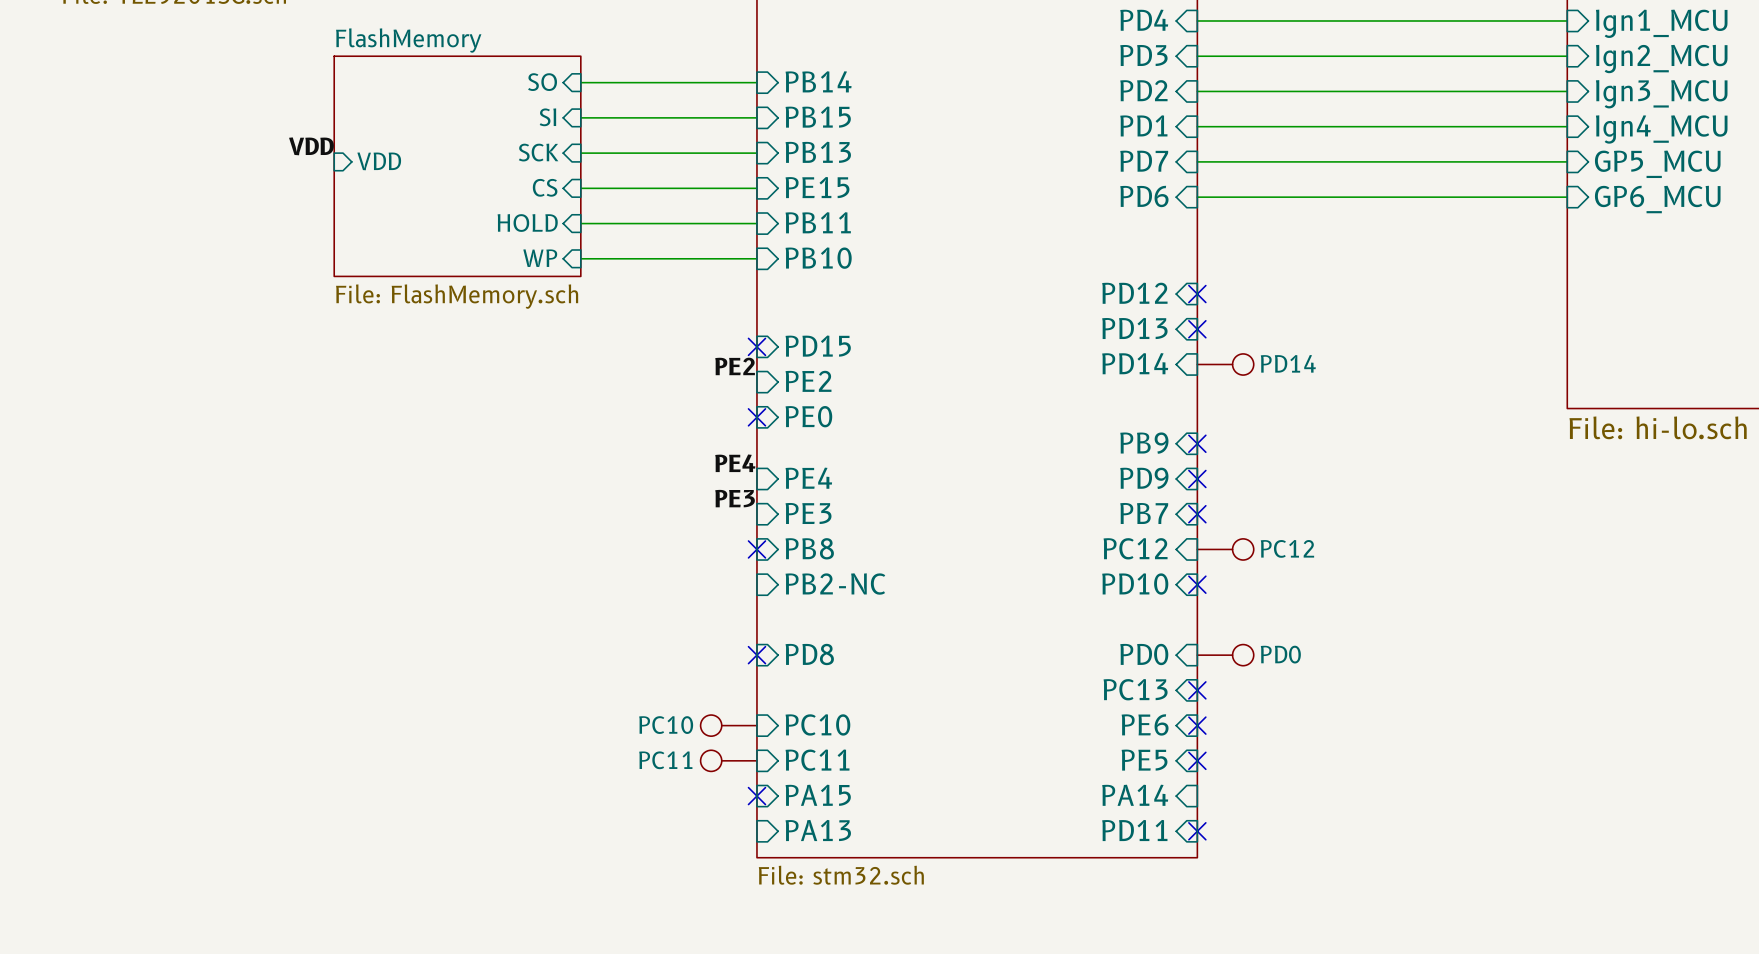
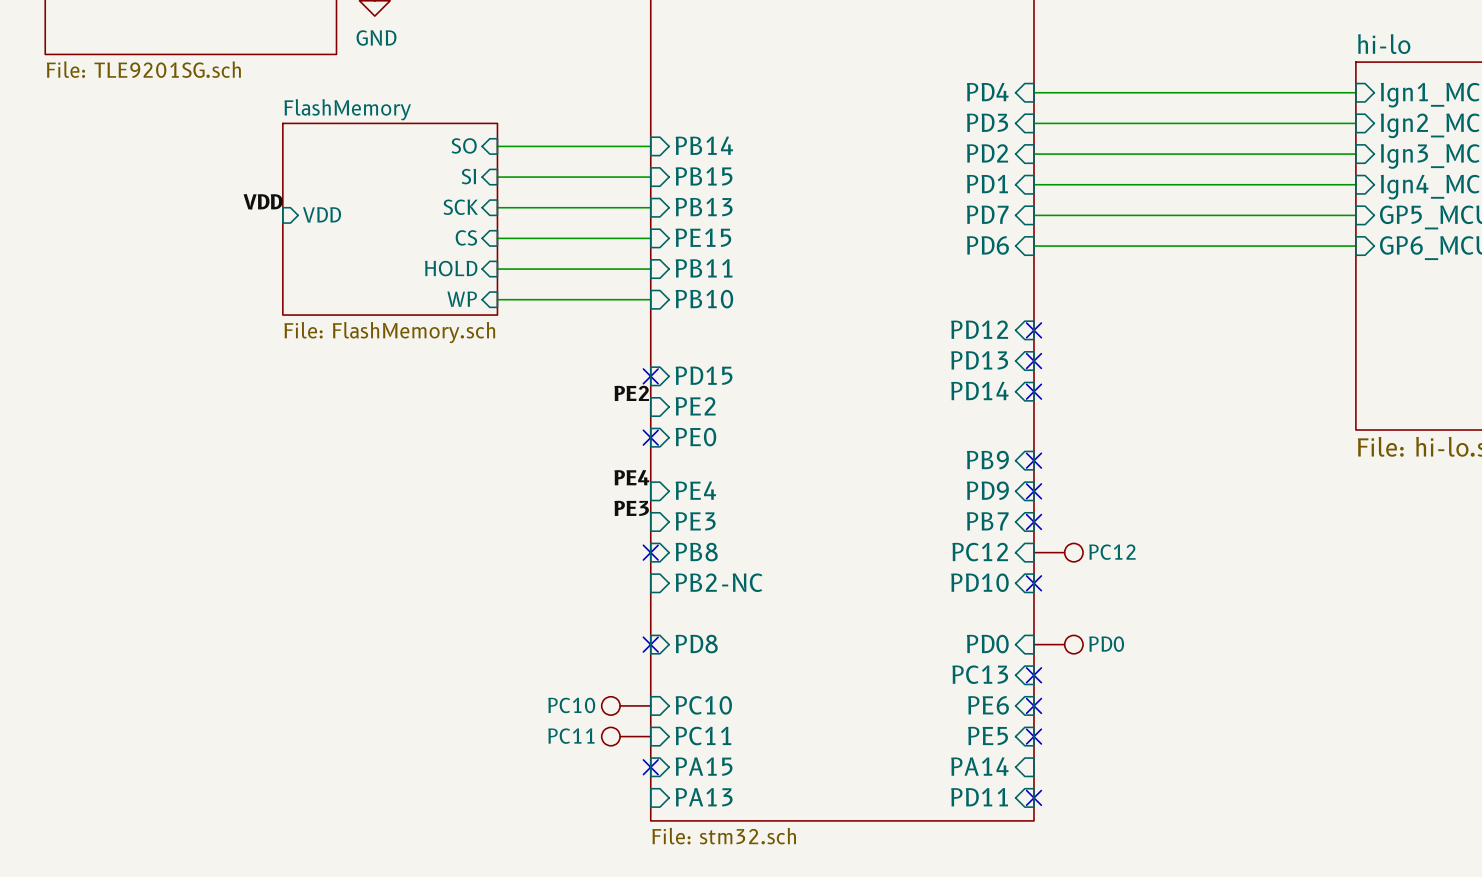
no-connect mark: none -> (1033, 391)
PD14: (1225, 364) -> none

